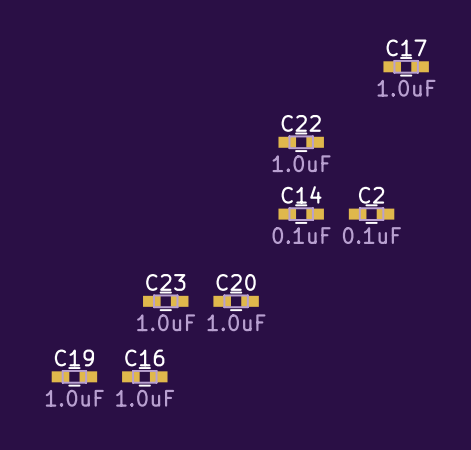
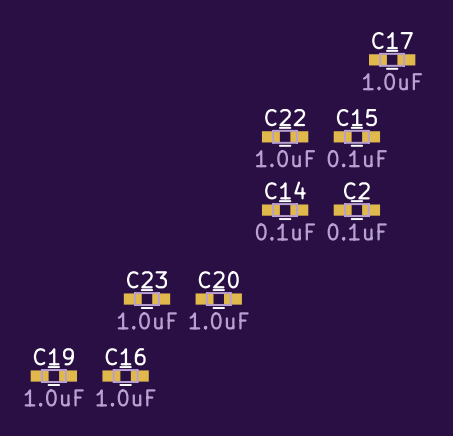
C15: none -> 0.1uF (356, 136)

